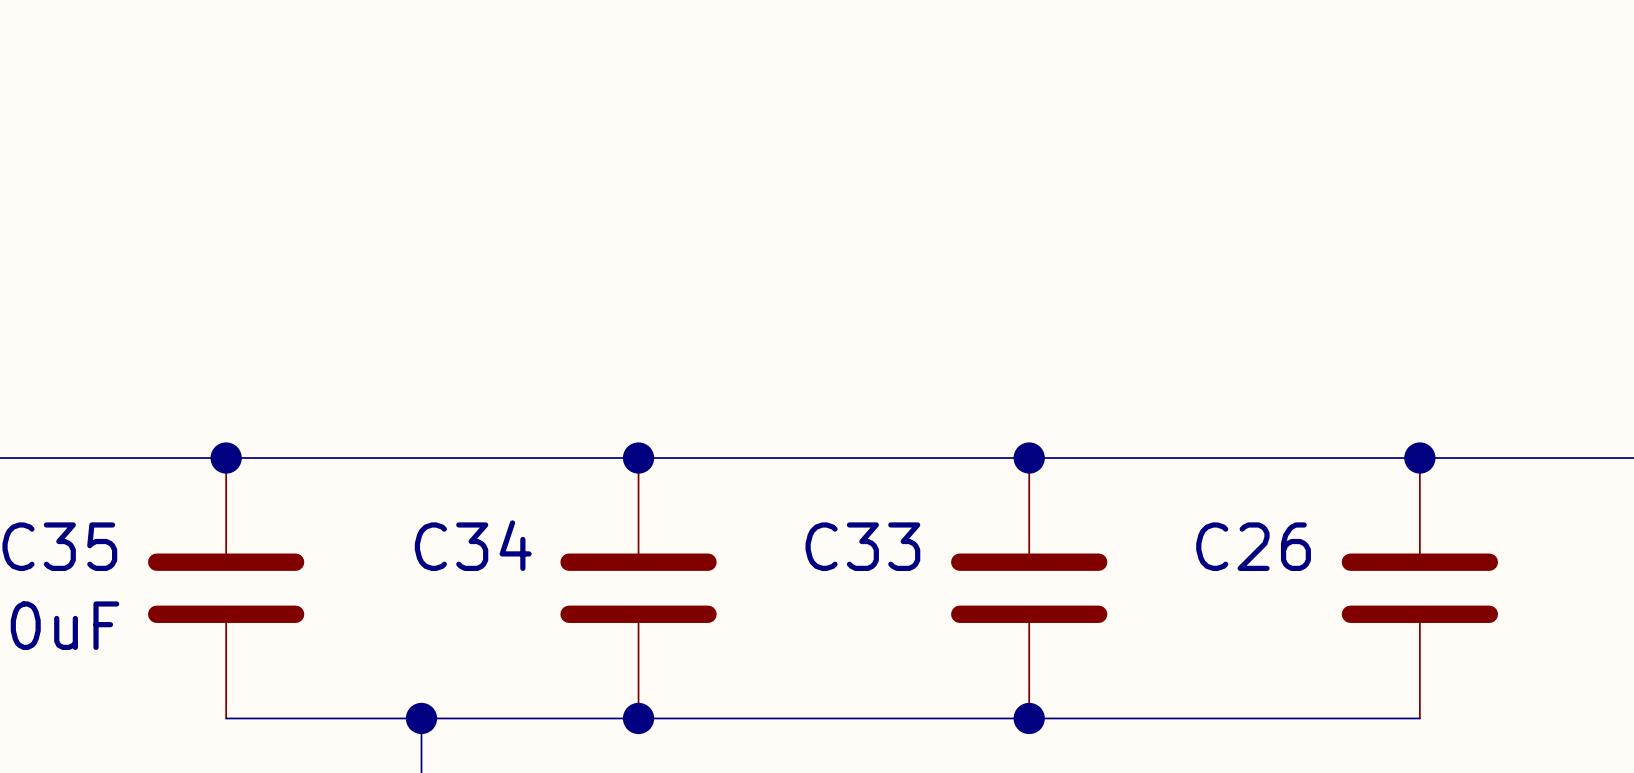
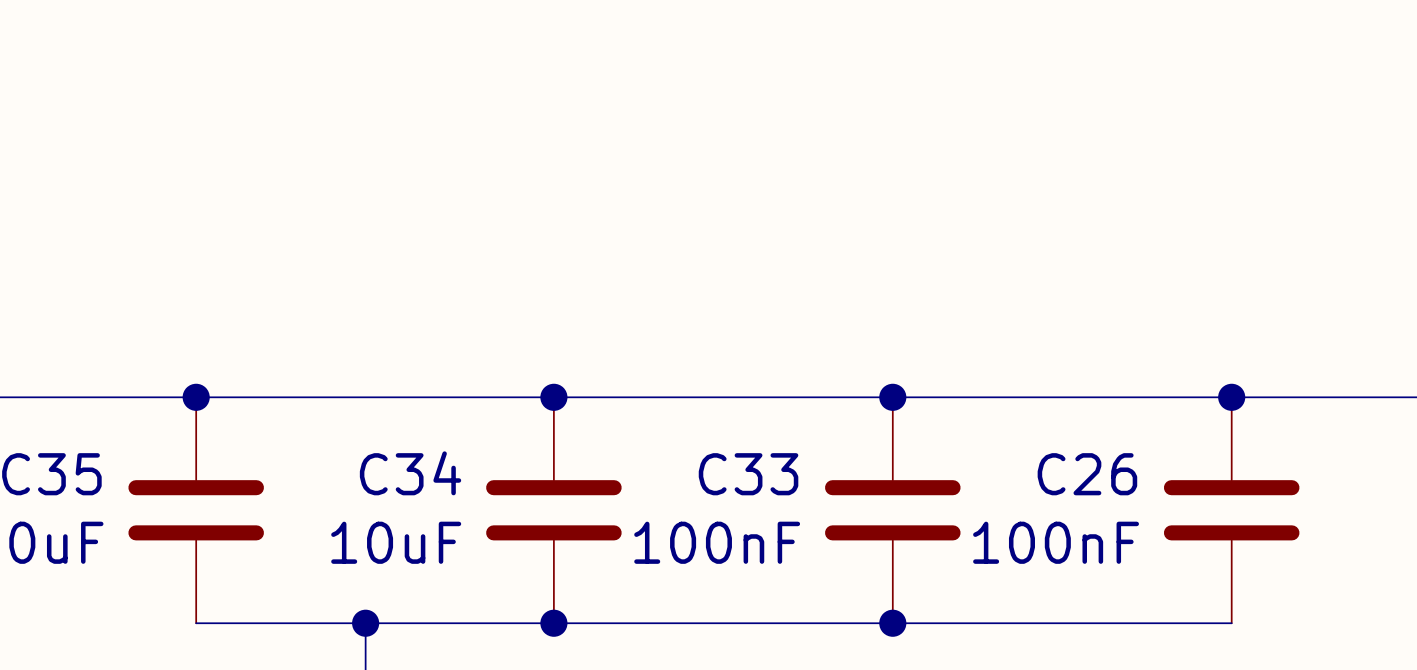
C34 value: none -> 10uF (396, 542)
C33 value: none -> 100nF (717, 542)
C26 value: none -> 100nF (1056, 542)

